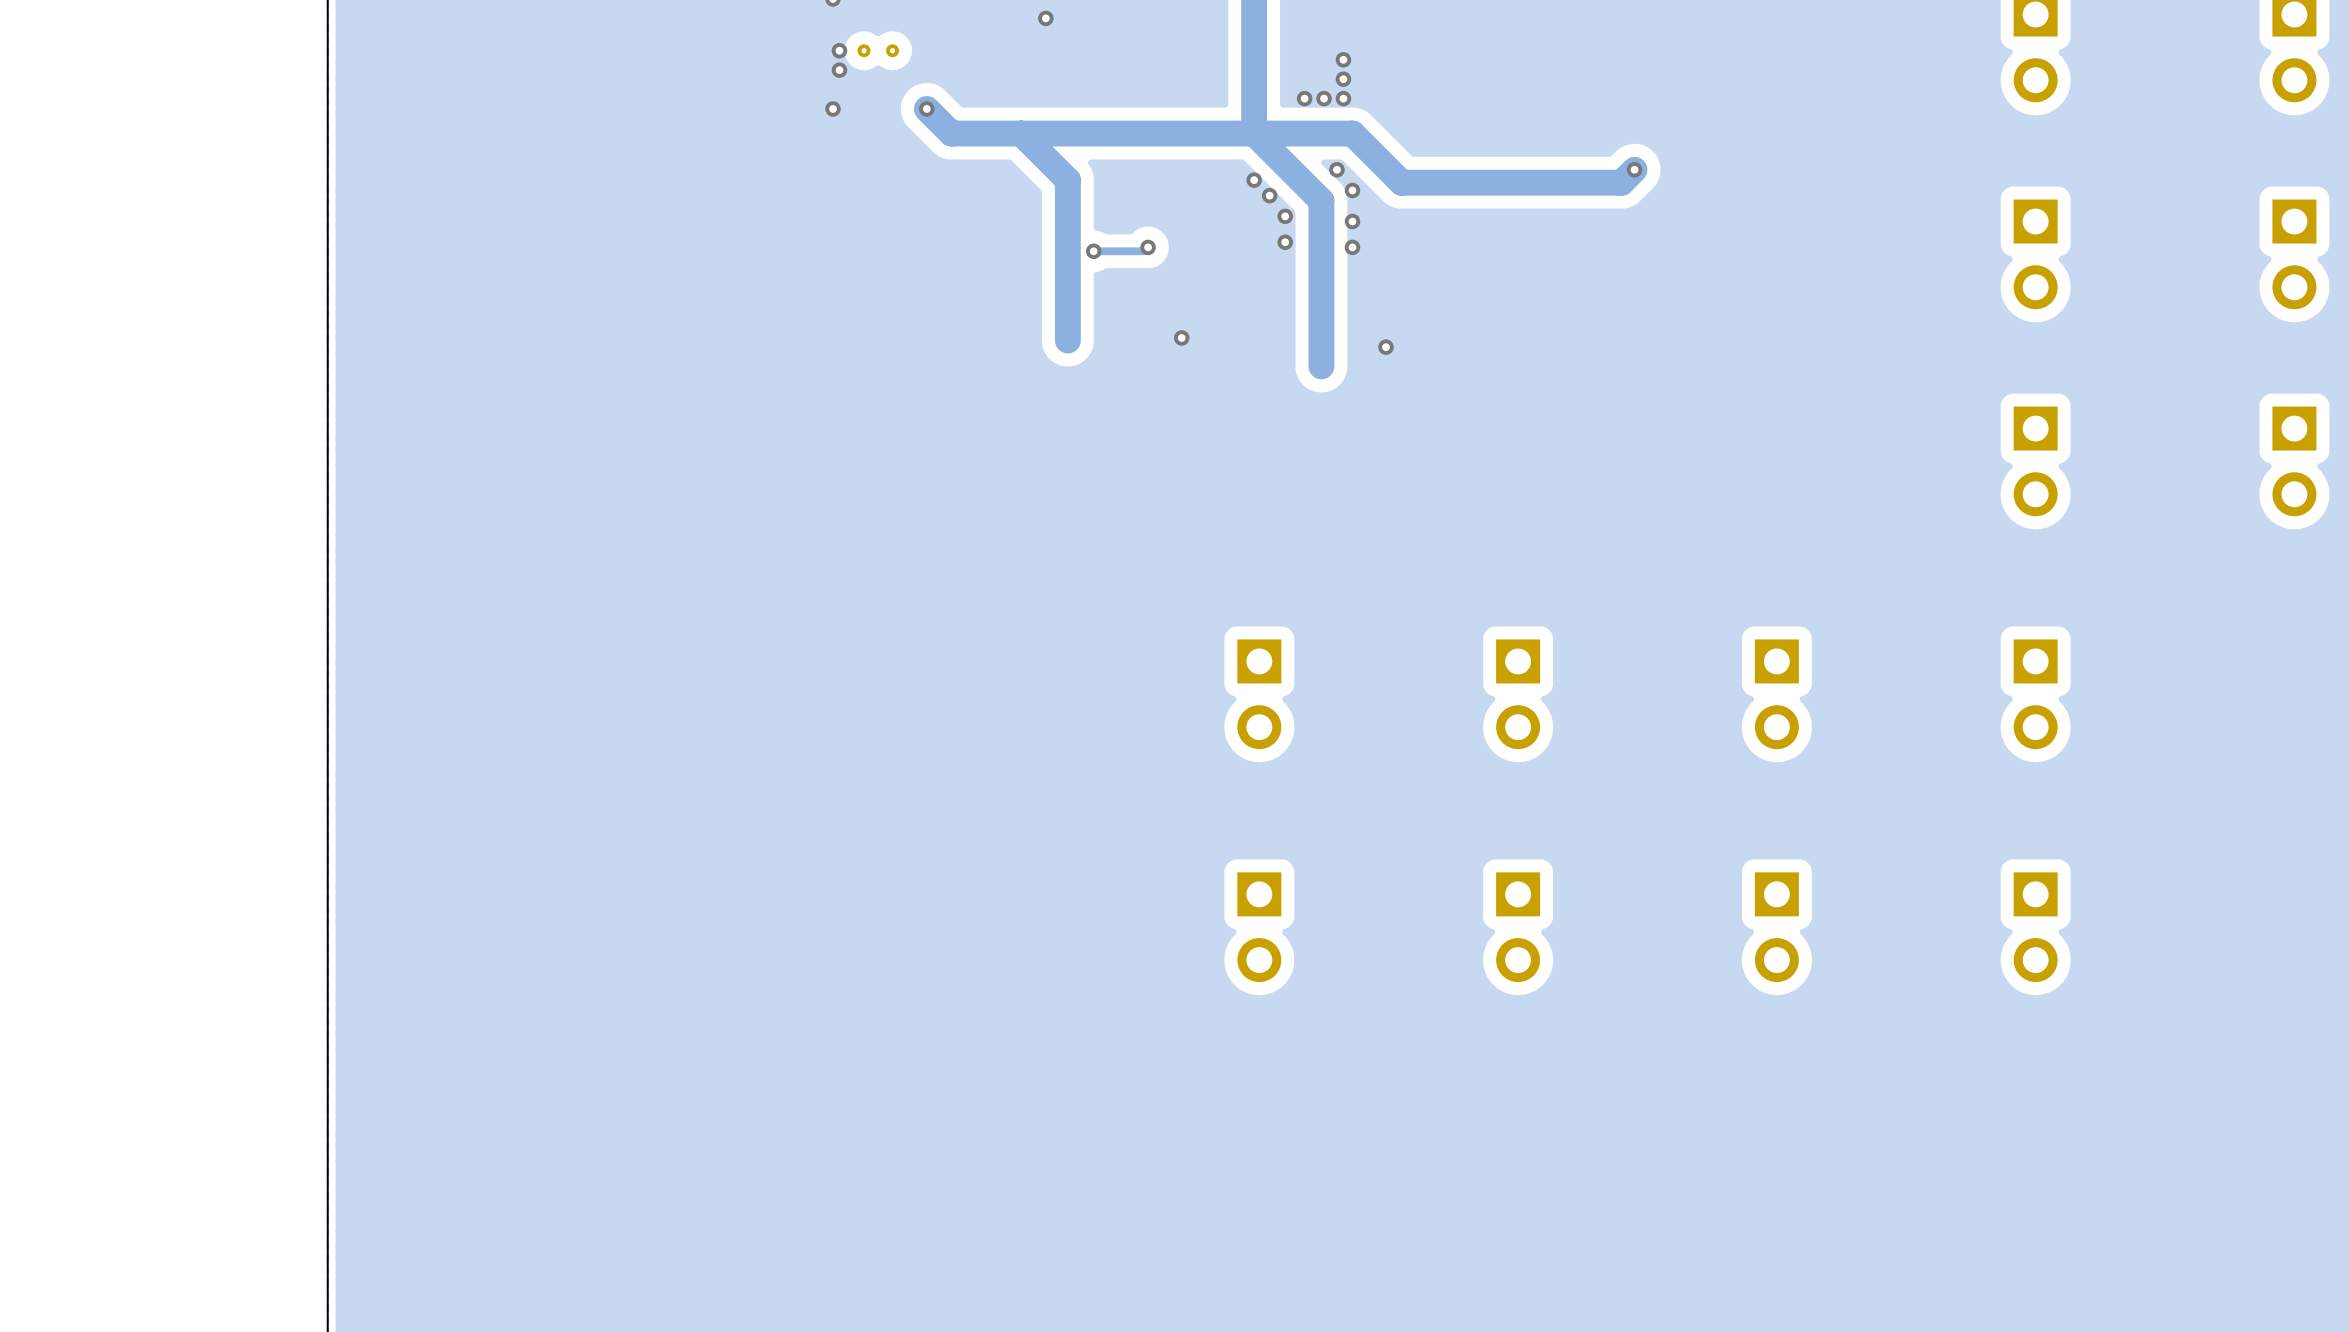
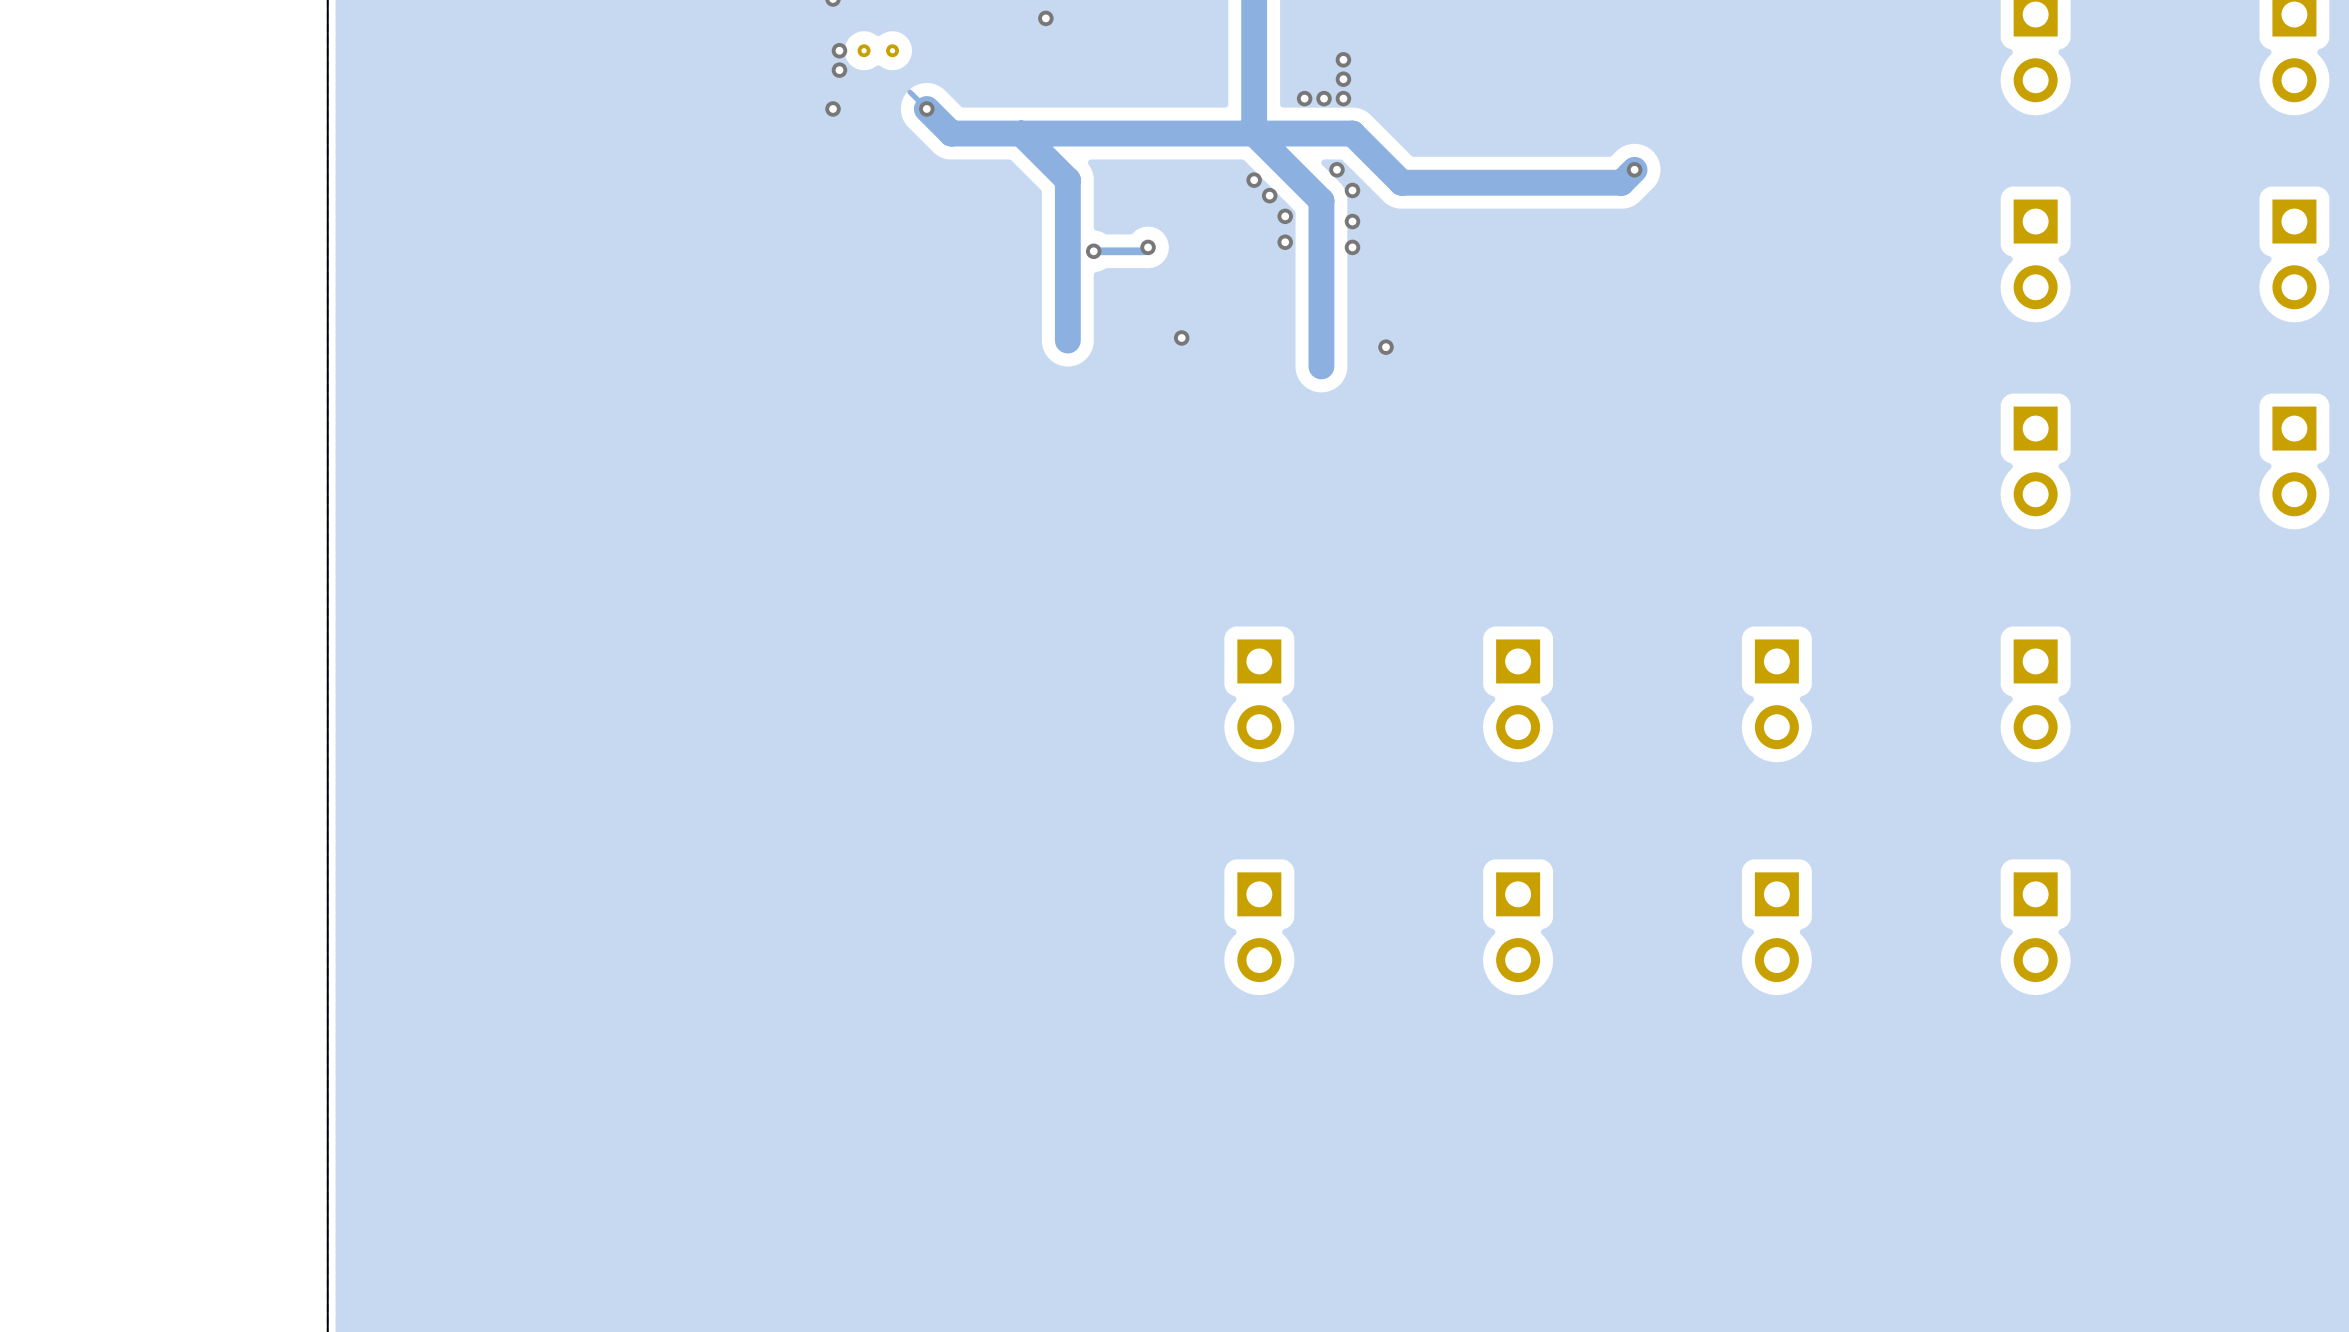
track: none -> (909, 92) (926, 108)

